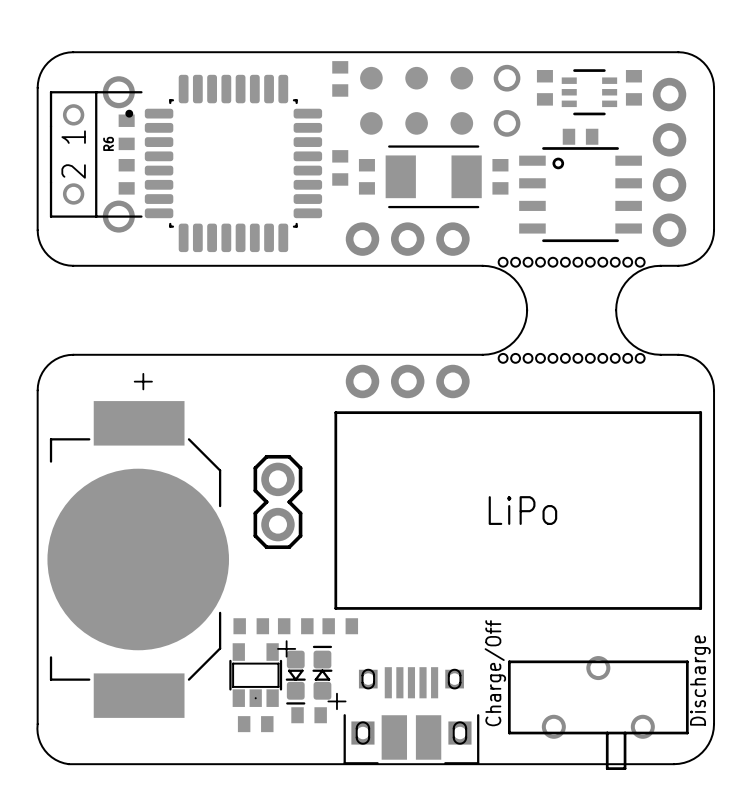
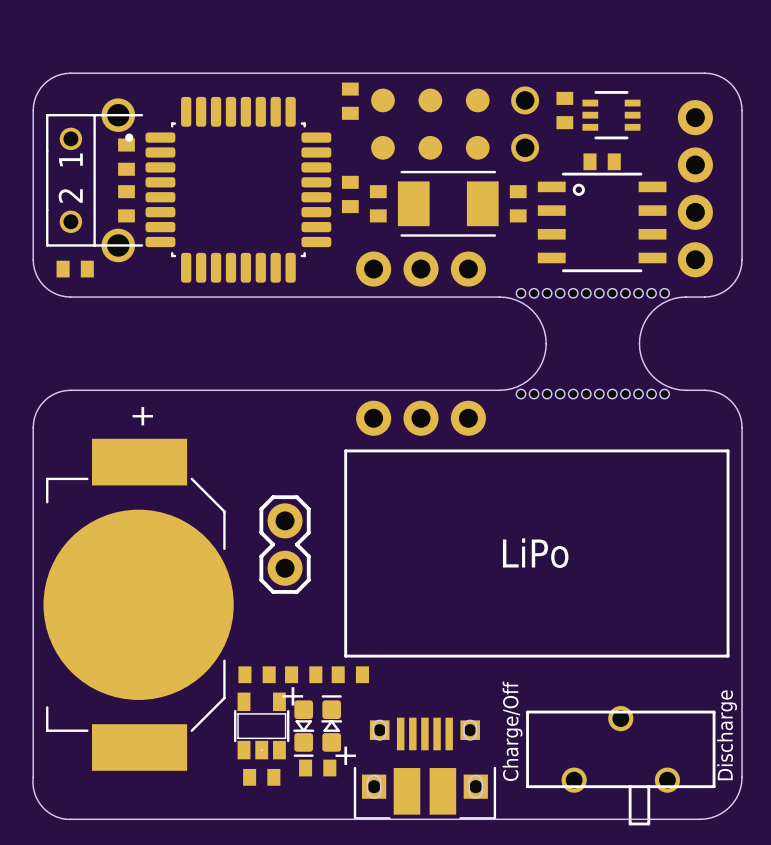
part: (633, 87) -> none
R6 name: R6 (108, 143) -> none
part: none -> (75, 269)

